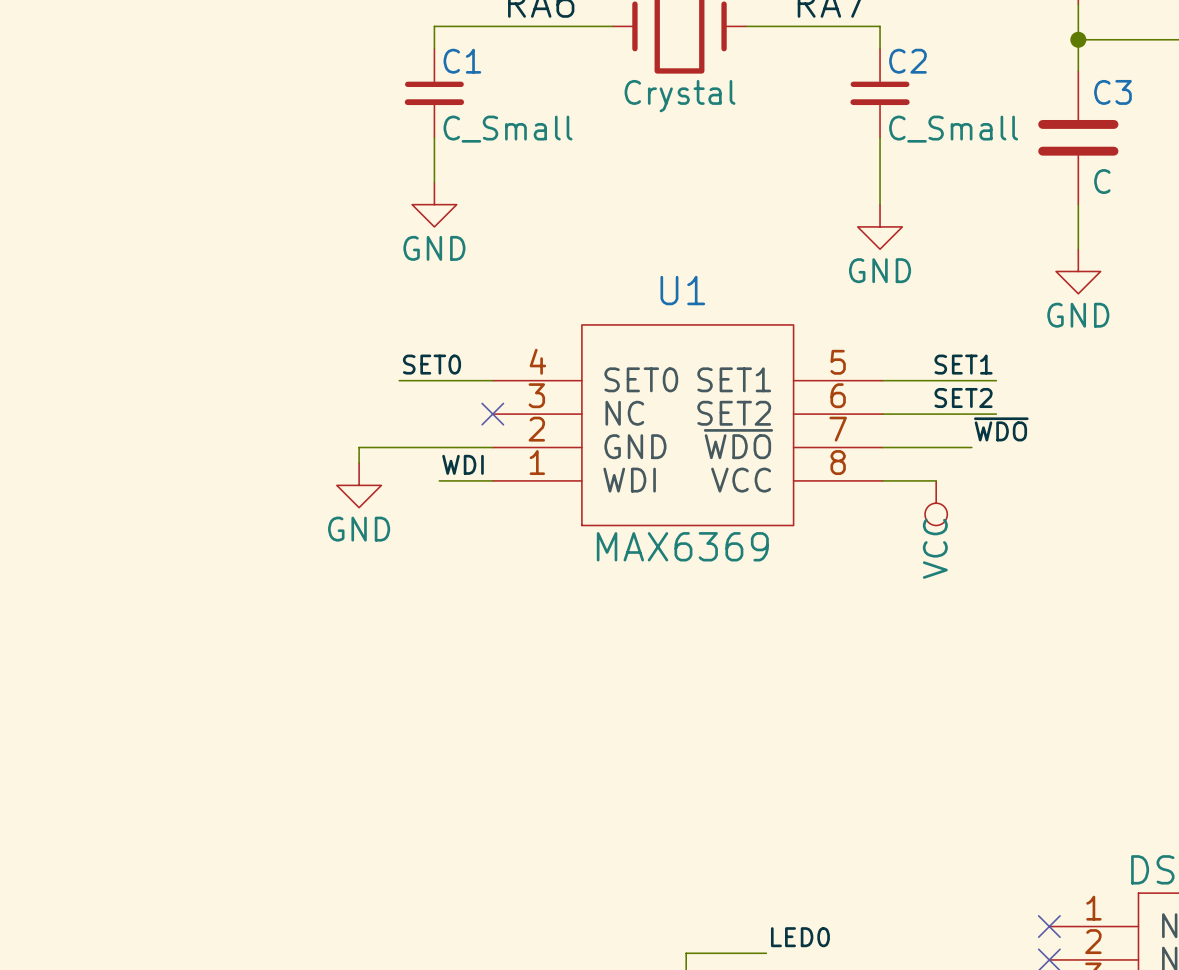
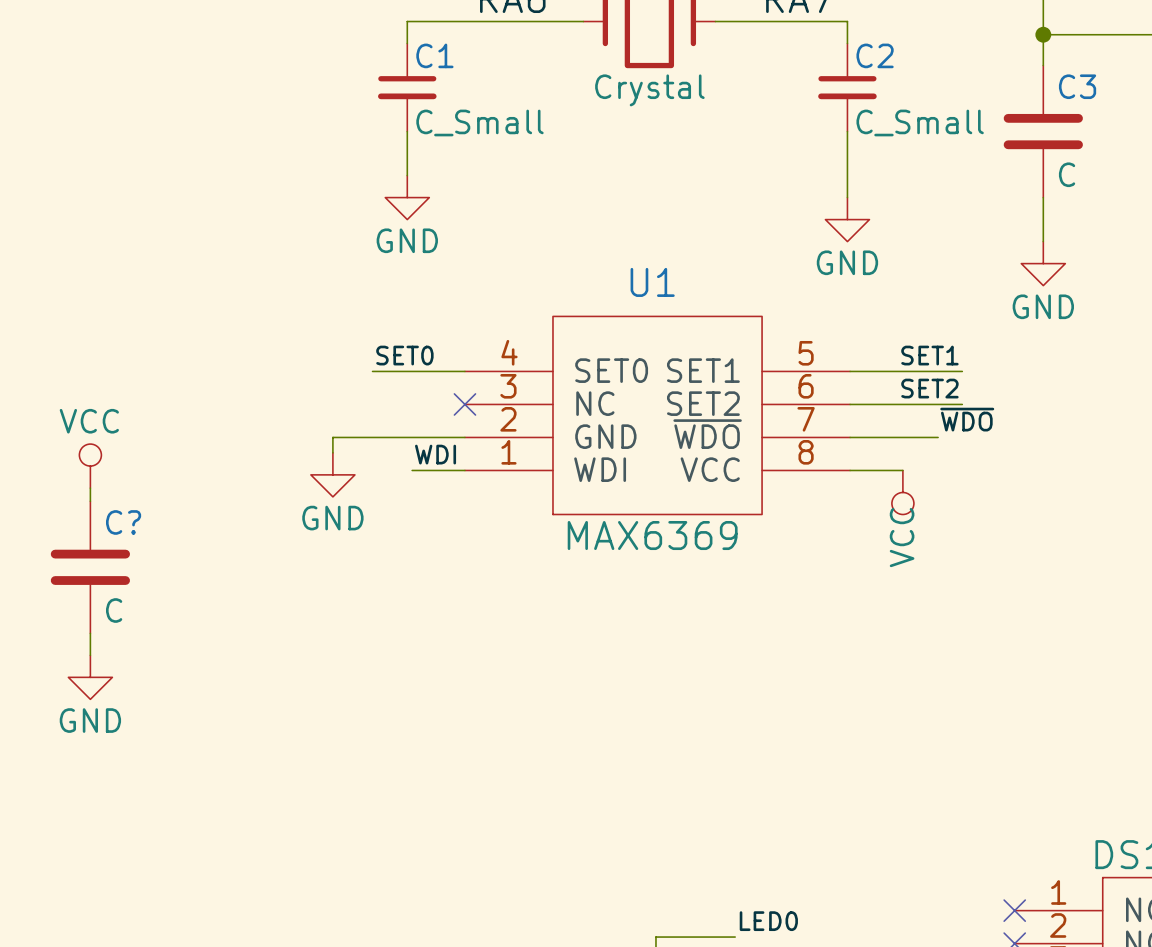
power symbol: none -> VCC (90, 466)
wire: none -> (90, 488) (90, 501)
C?: none -> C (90, 567)
wire: none -> (90, 633) (90, 655)
power symbol: none -> GND (90, 677)

